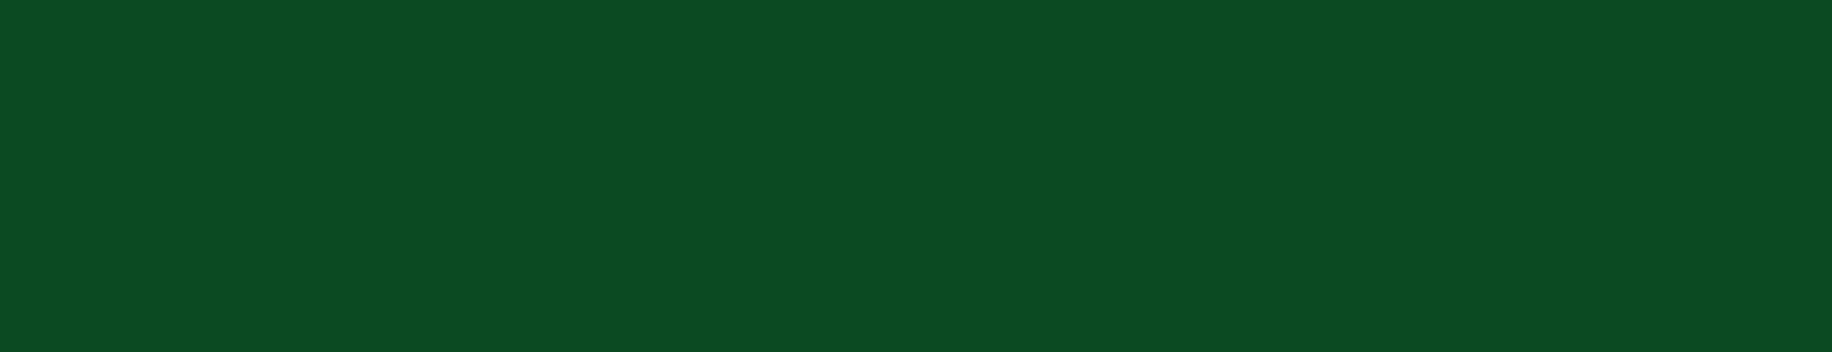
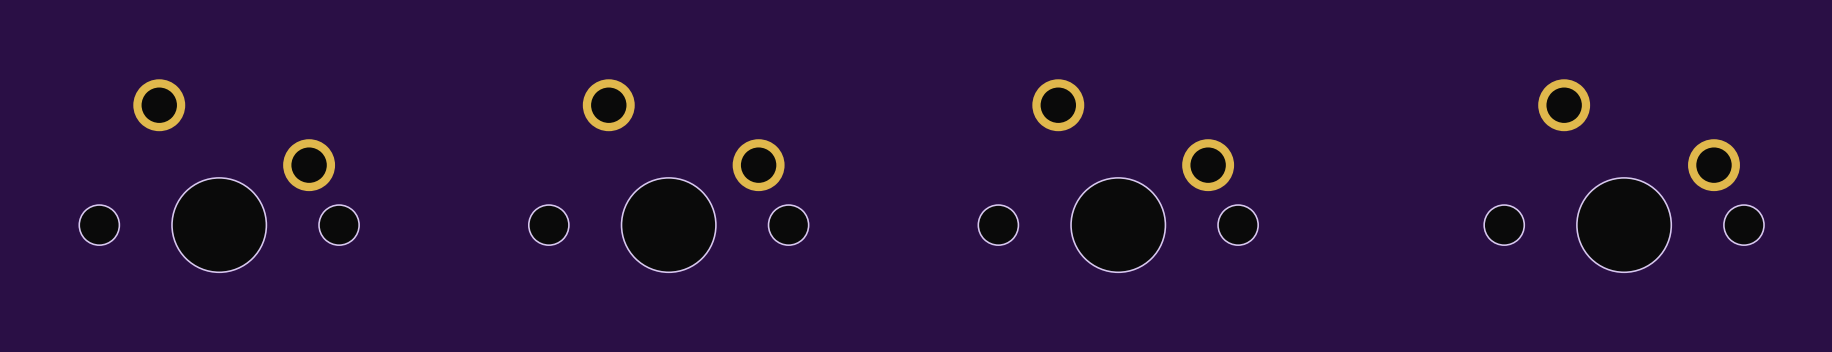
part: none -> (219, 175)
part: none -> (668, 175)
part: none -> (1118, 175)
part: none -> (1624, 175)

